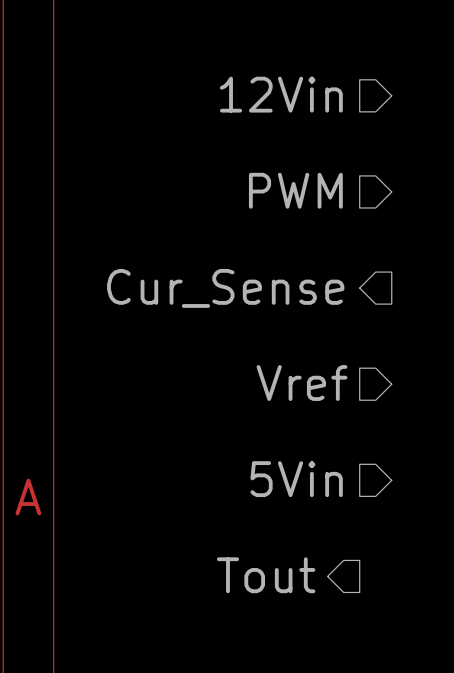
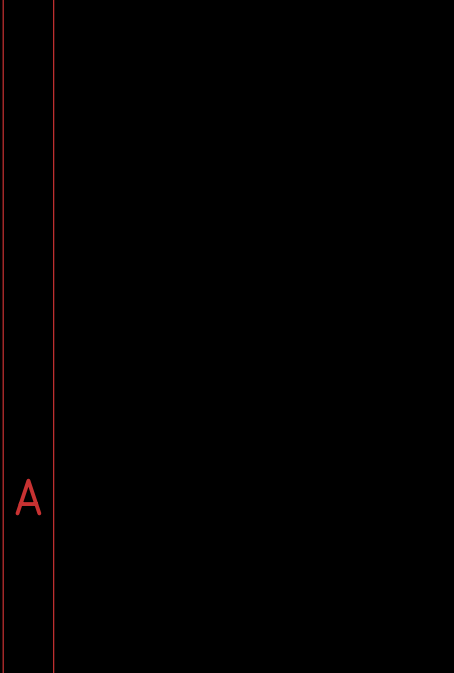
hierarchical label: 12Vin (281, 94) -> none
hierarchical label: PWM (295, 190) -> none
hierarchical label: Cur_Sense (225, 288) -> none
hierarchical label: Vref (301, 383) -> none
hierarchical label: 5Vin (296, 479) -> none
hierarchical label: Tout (266, 575) -> none

